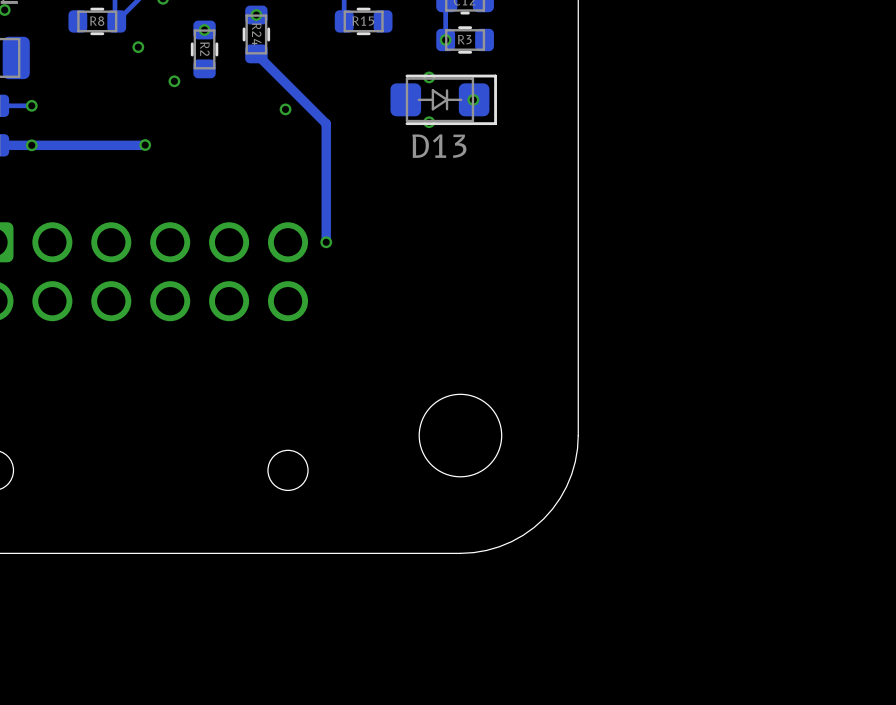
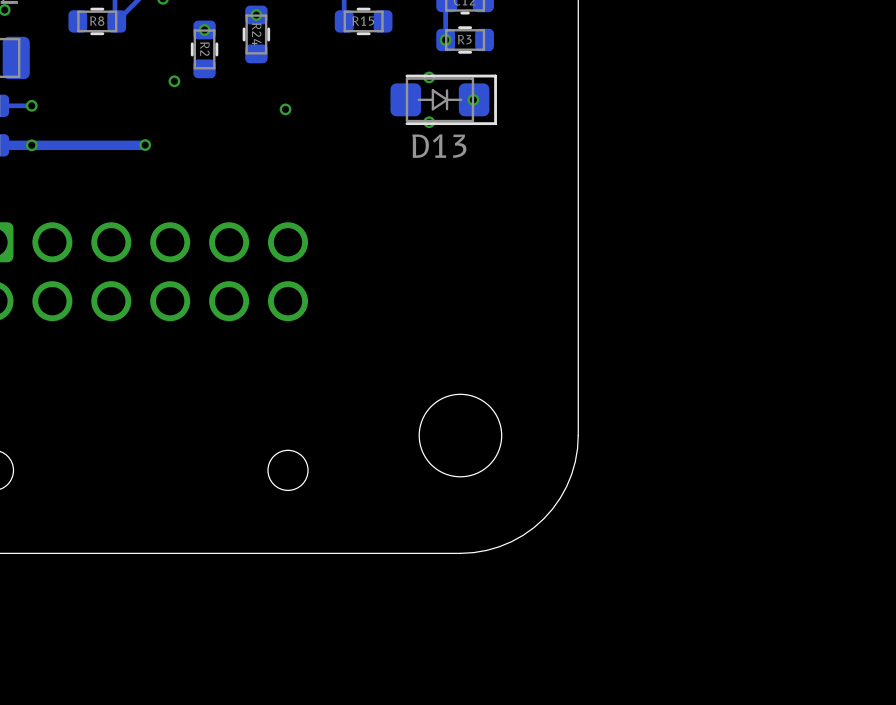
via: (138, 47) -> none
track: (256, 53) (326, 123) (326, 242) -> none
via: (326, 242) -> none

